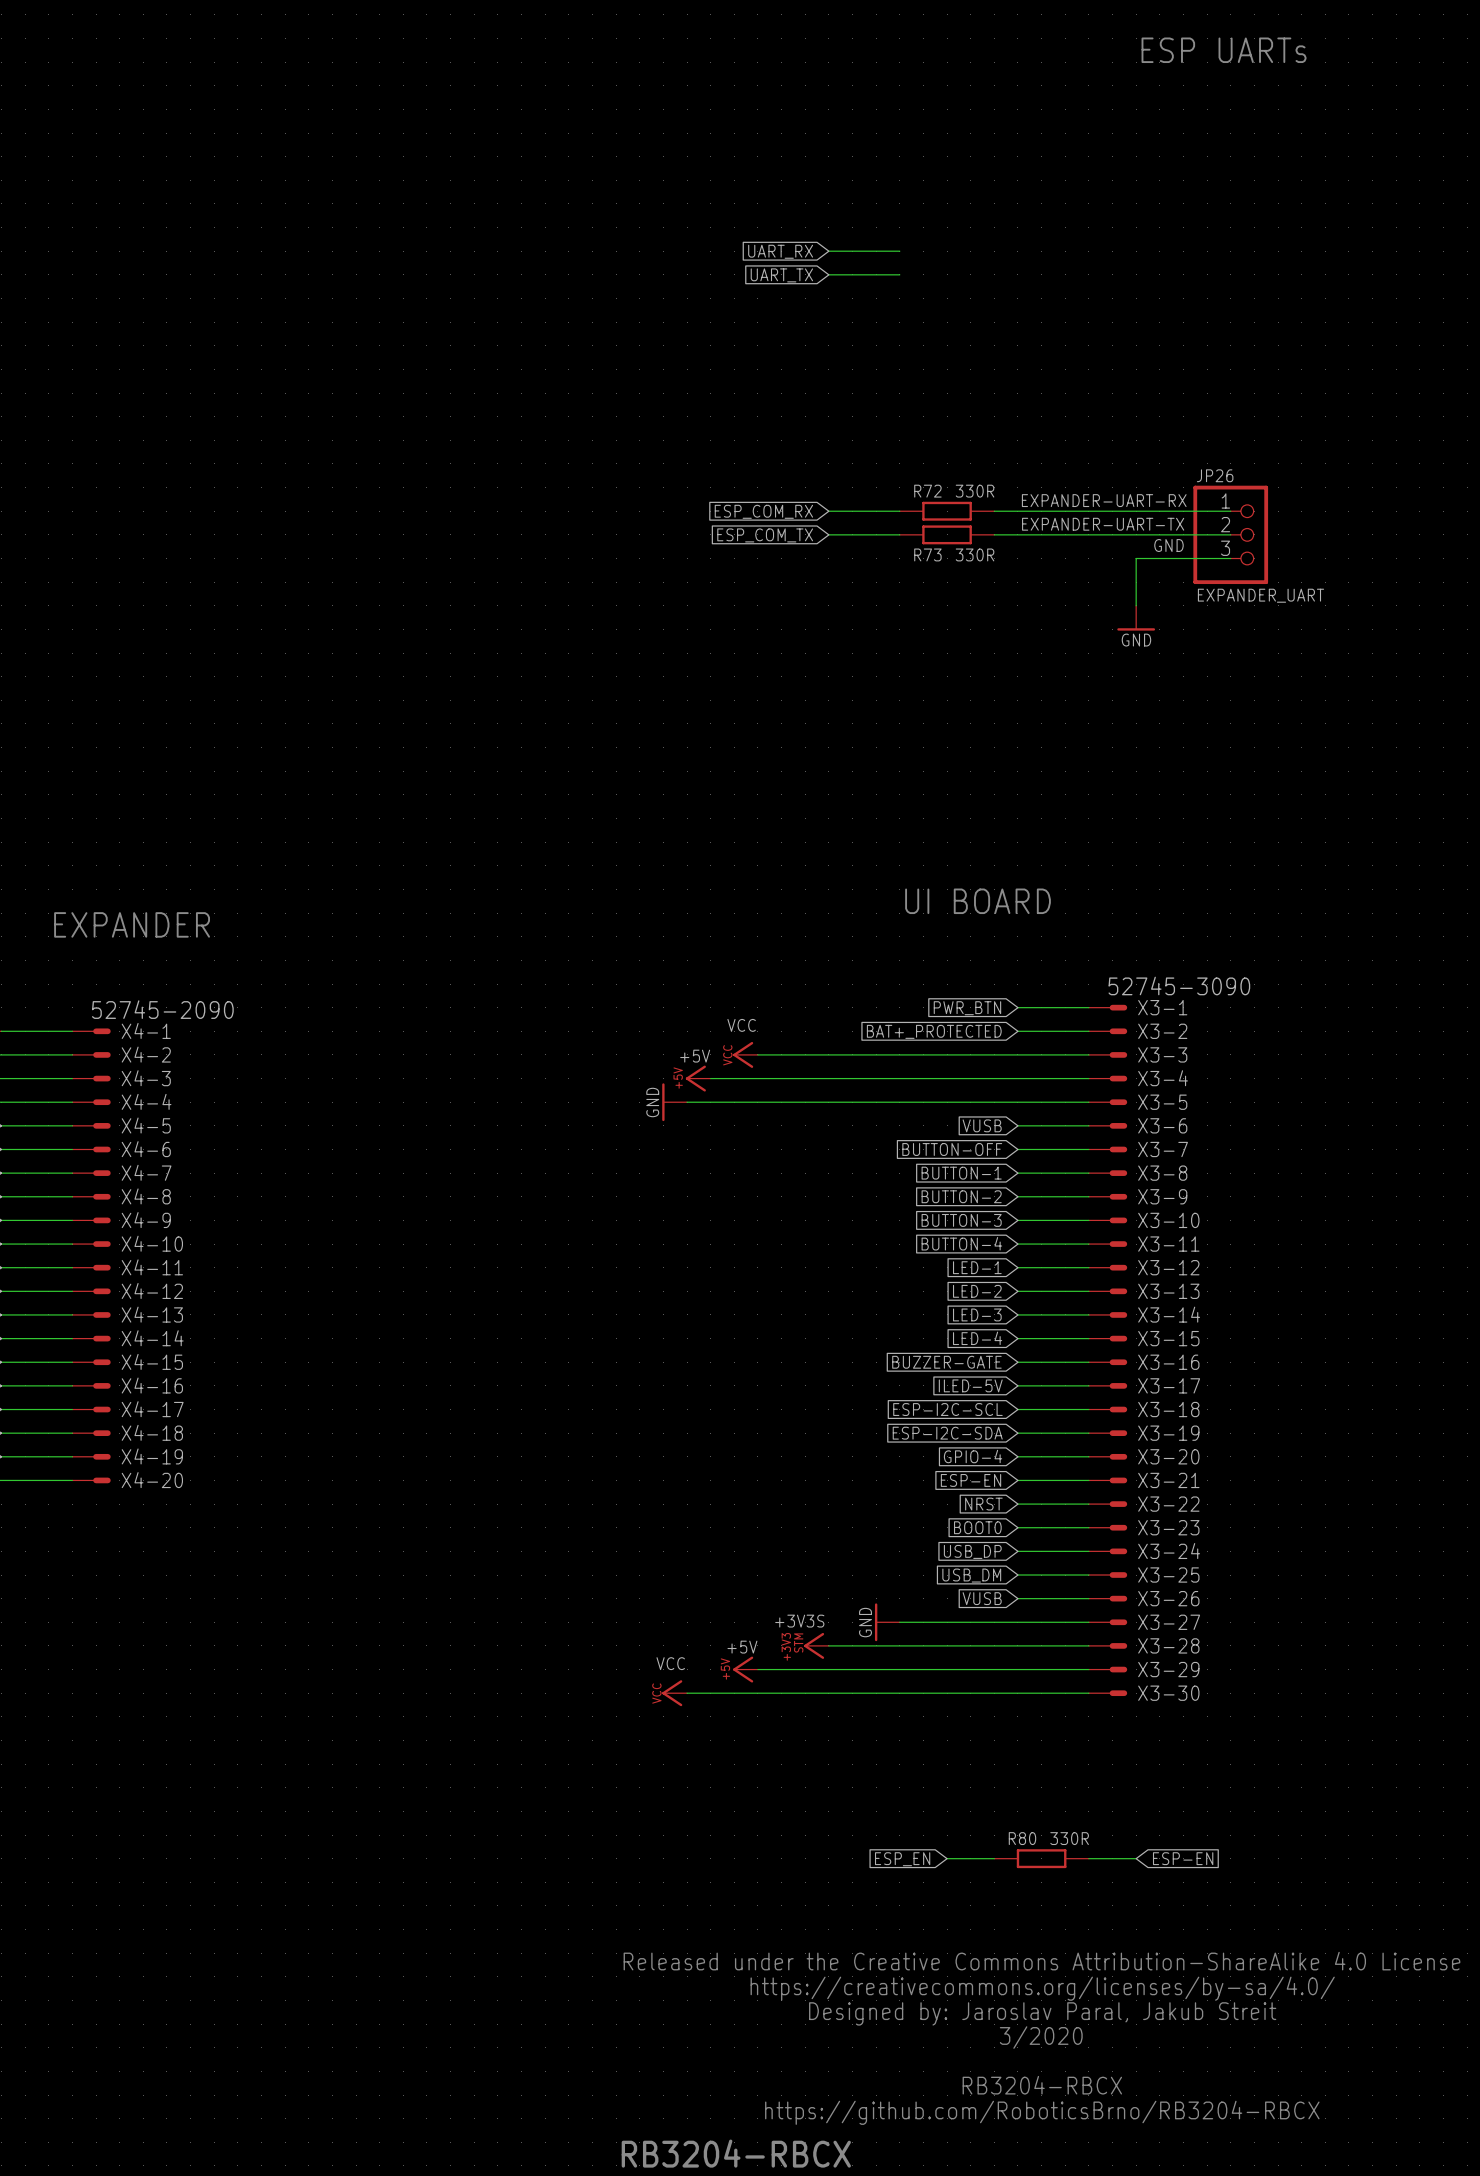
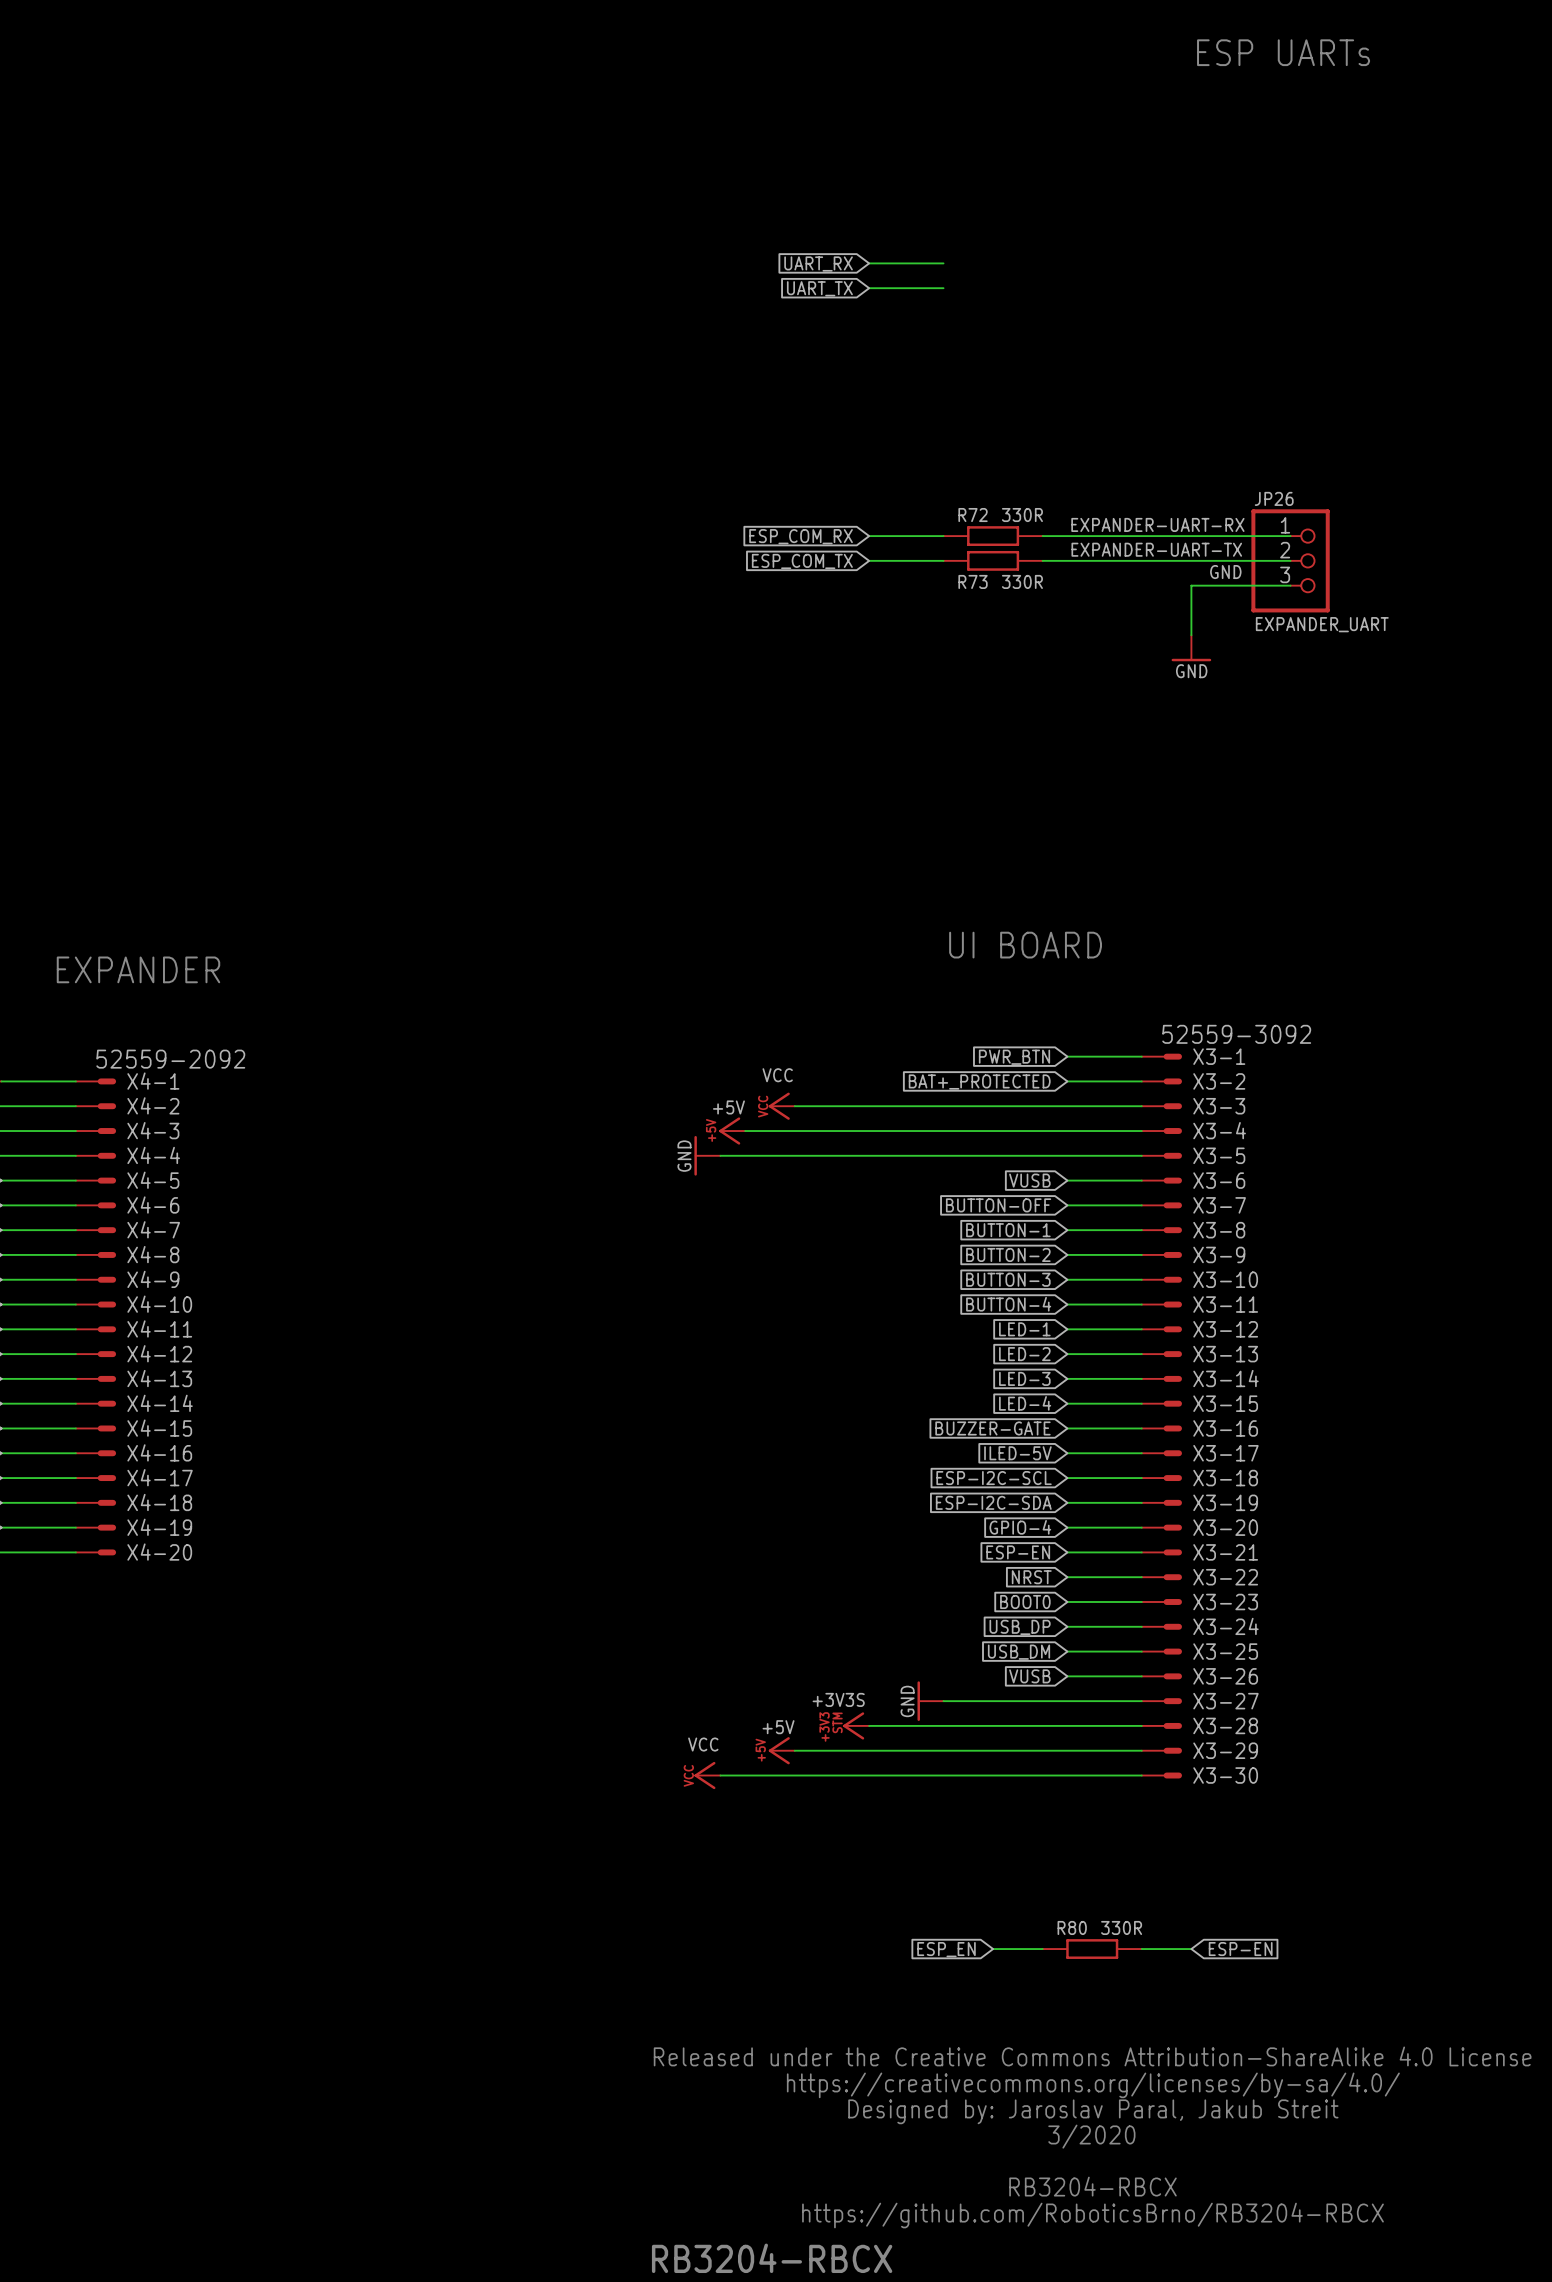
X3-1 value: 52745-3090 (1179, 985) -> 52559-3092 (1236, 1034)
X4-1 value: 52745-2090 (162, 1009) -> 52559-2092 (170, 1059)

